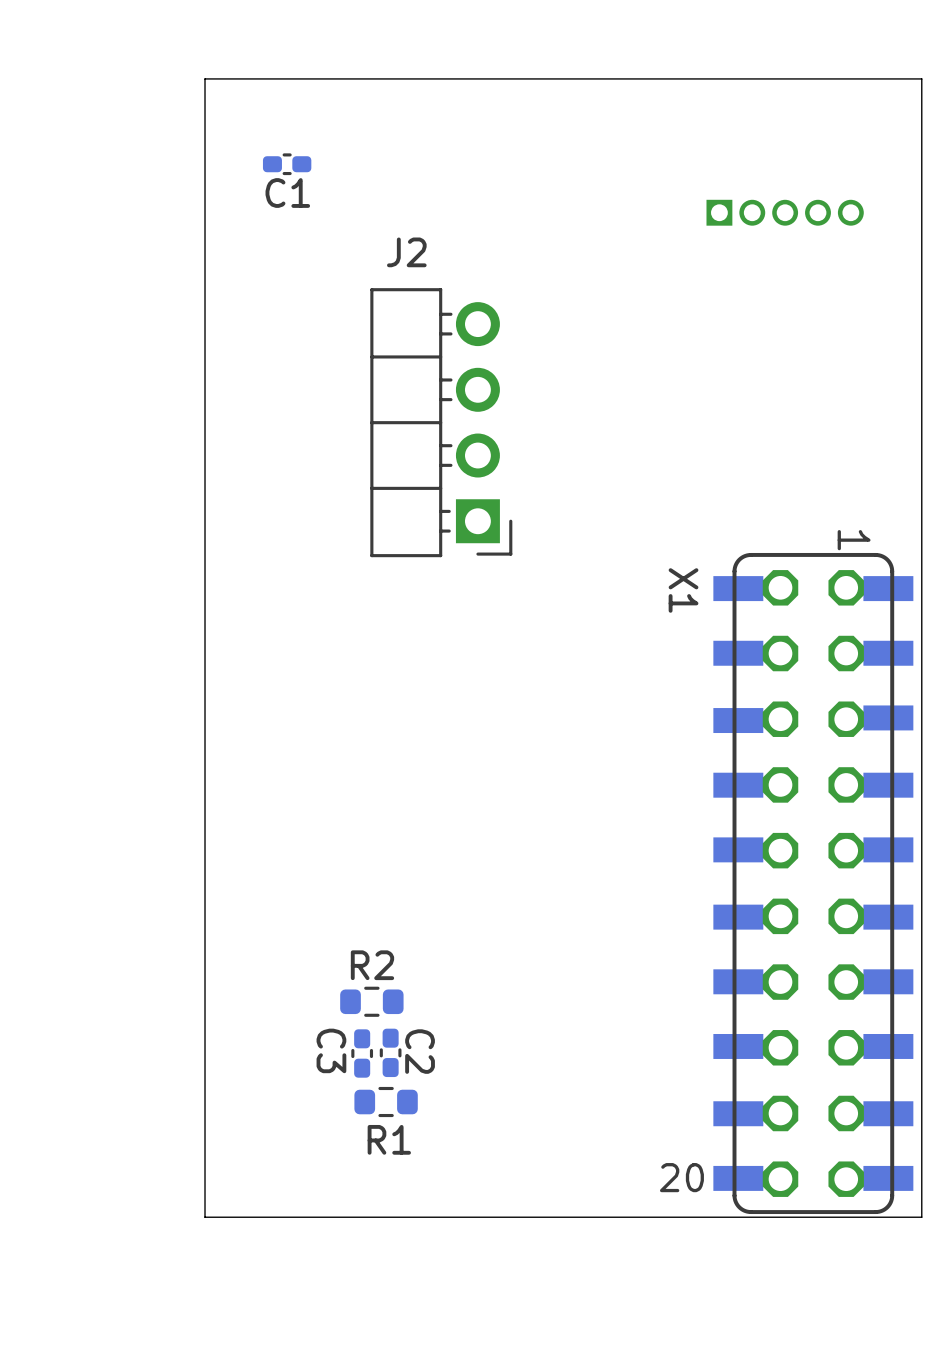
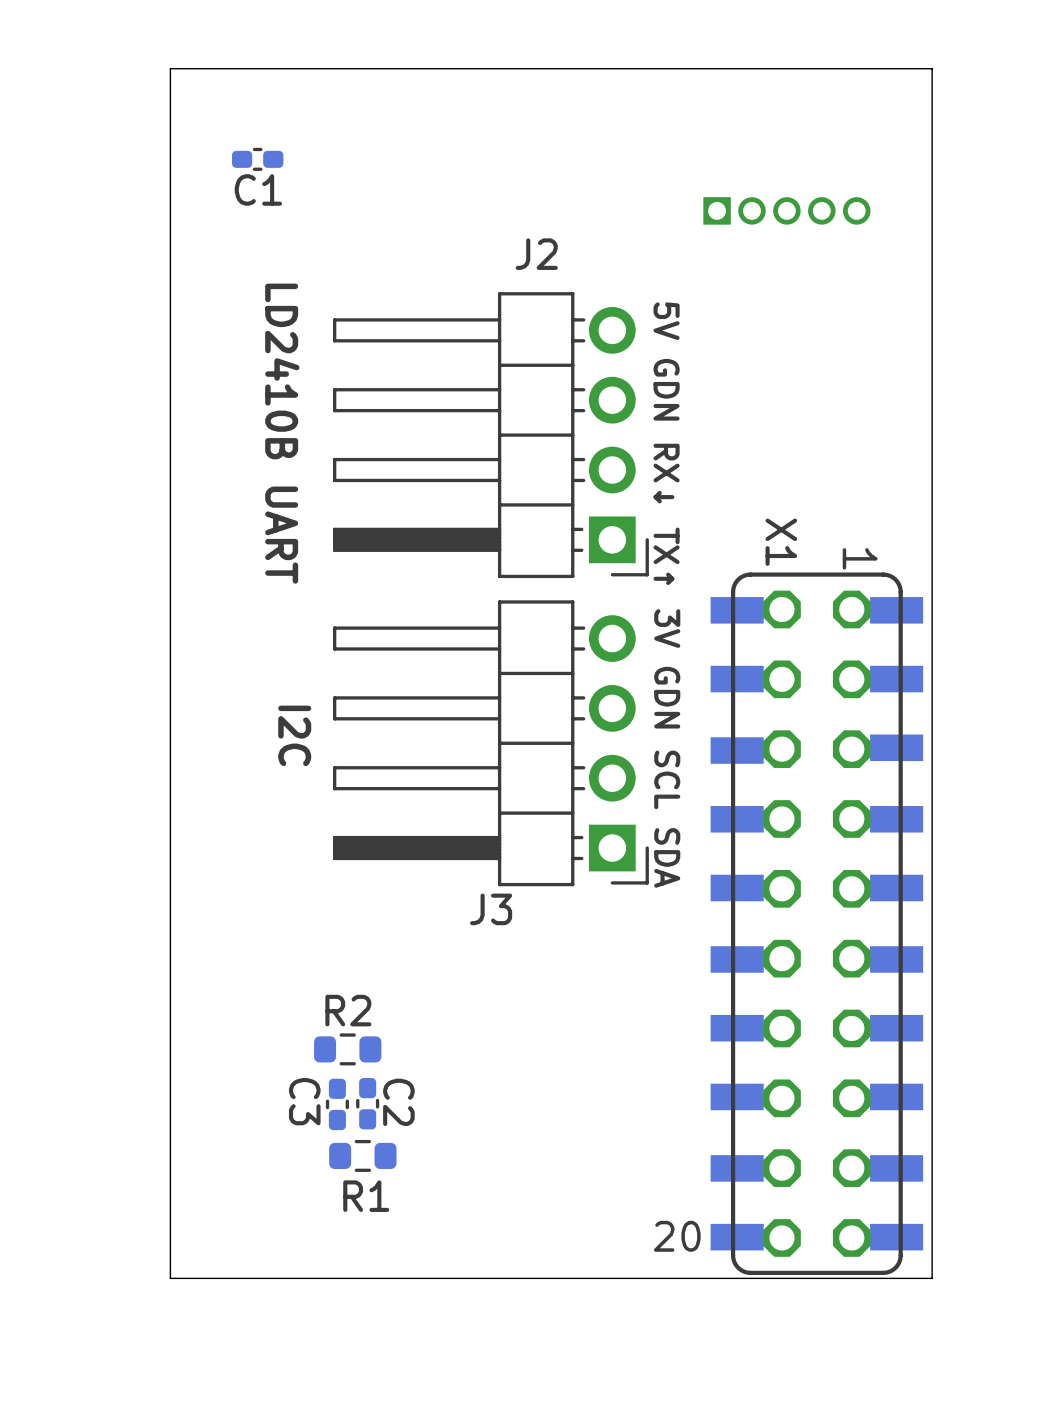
J2 name position: J2 (406, 252) -> J2 (536, 254)
J2 footprint: [370, 288, 513, 558] -> [333, 292, 649, 579]
text: none -> LD2410B UART (282, 433)
text: none -> 5V GDN RX↓ TX↑ (666, 443)
X1 name position: X1 (683, 590) -> X1 (781, 542)
text: none -> I2C (294, 735)
J3: none -> (490, 743)
text: none -> 3V GDN SCL SDA (667, 748)

